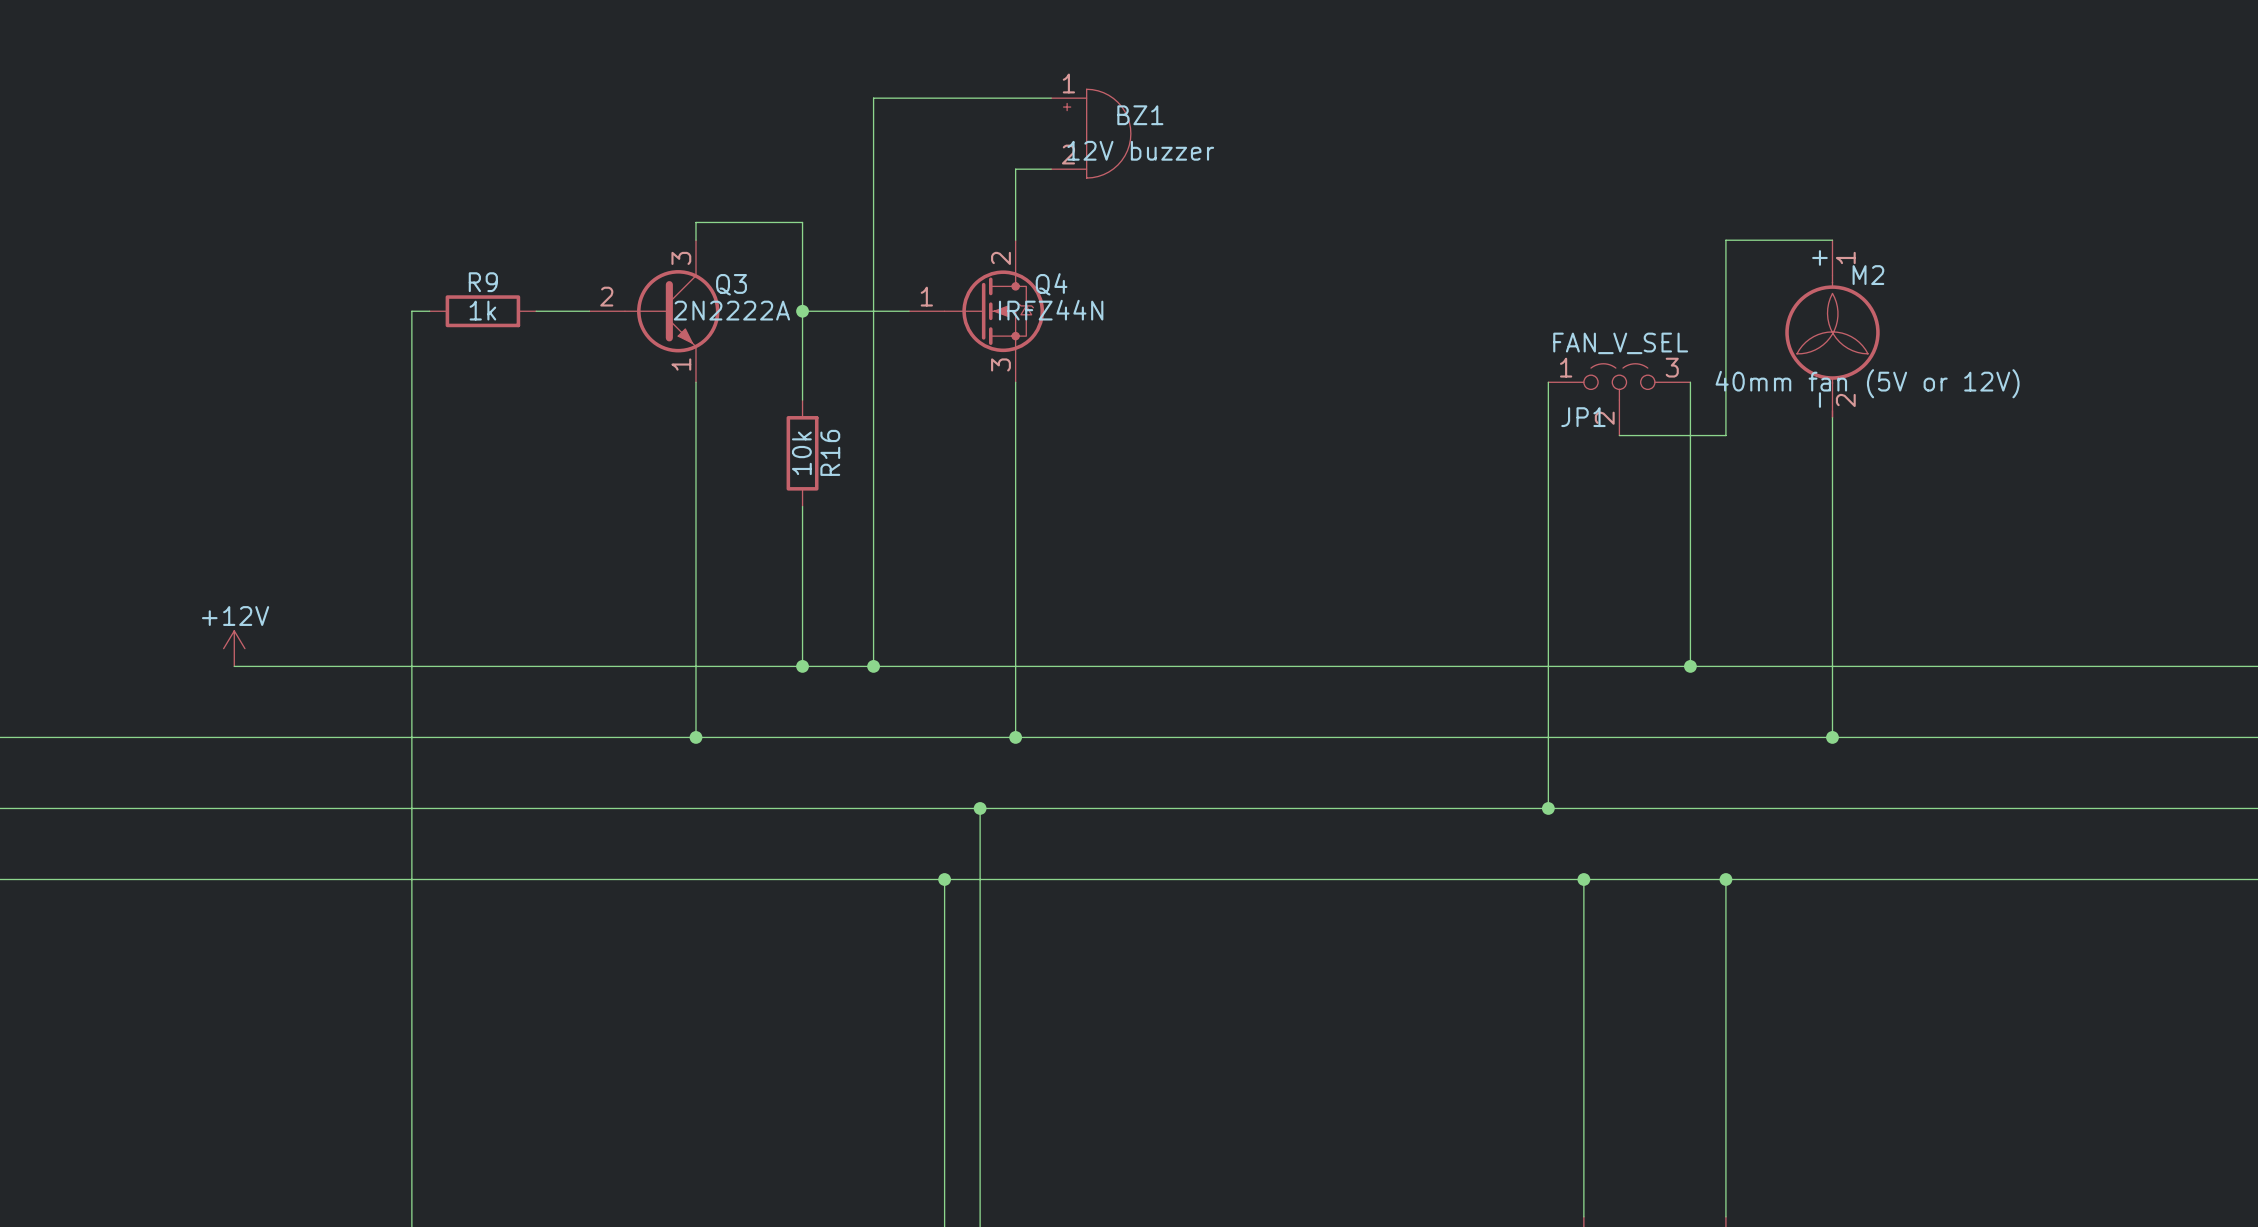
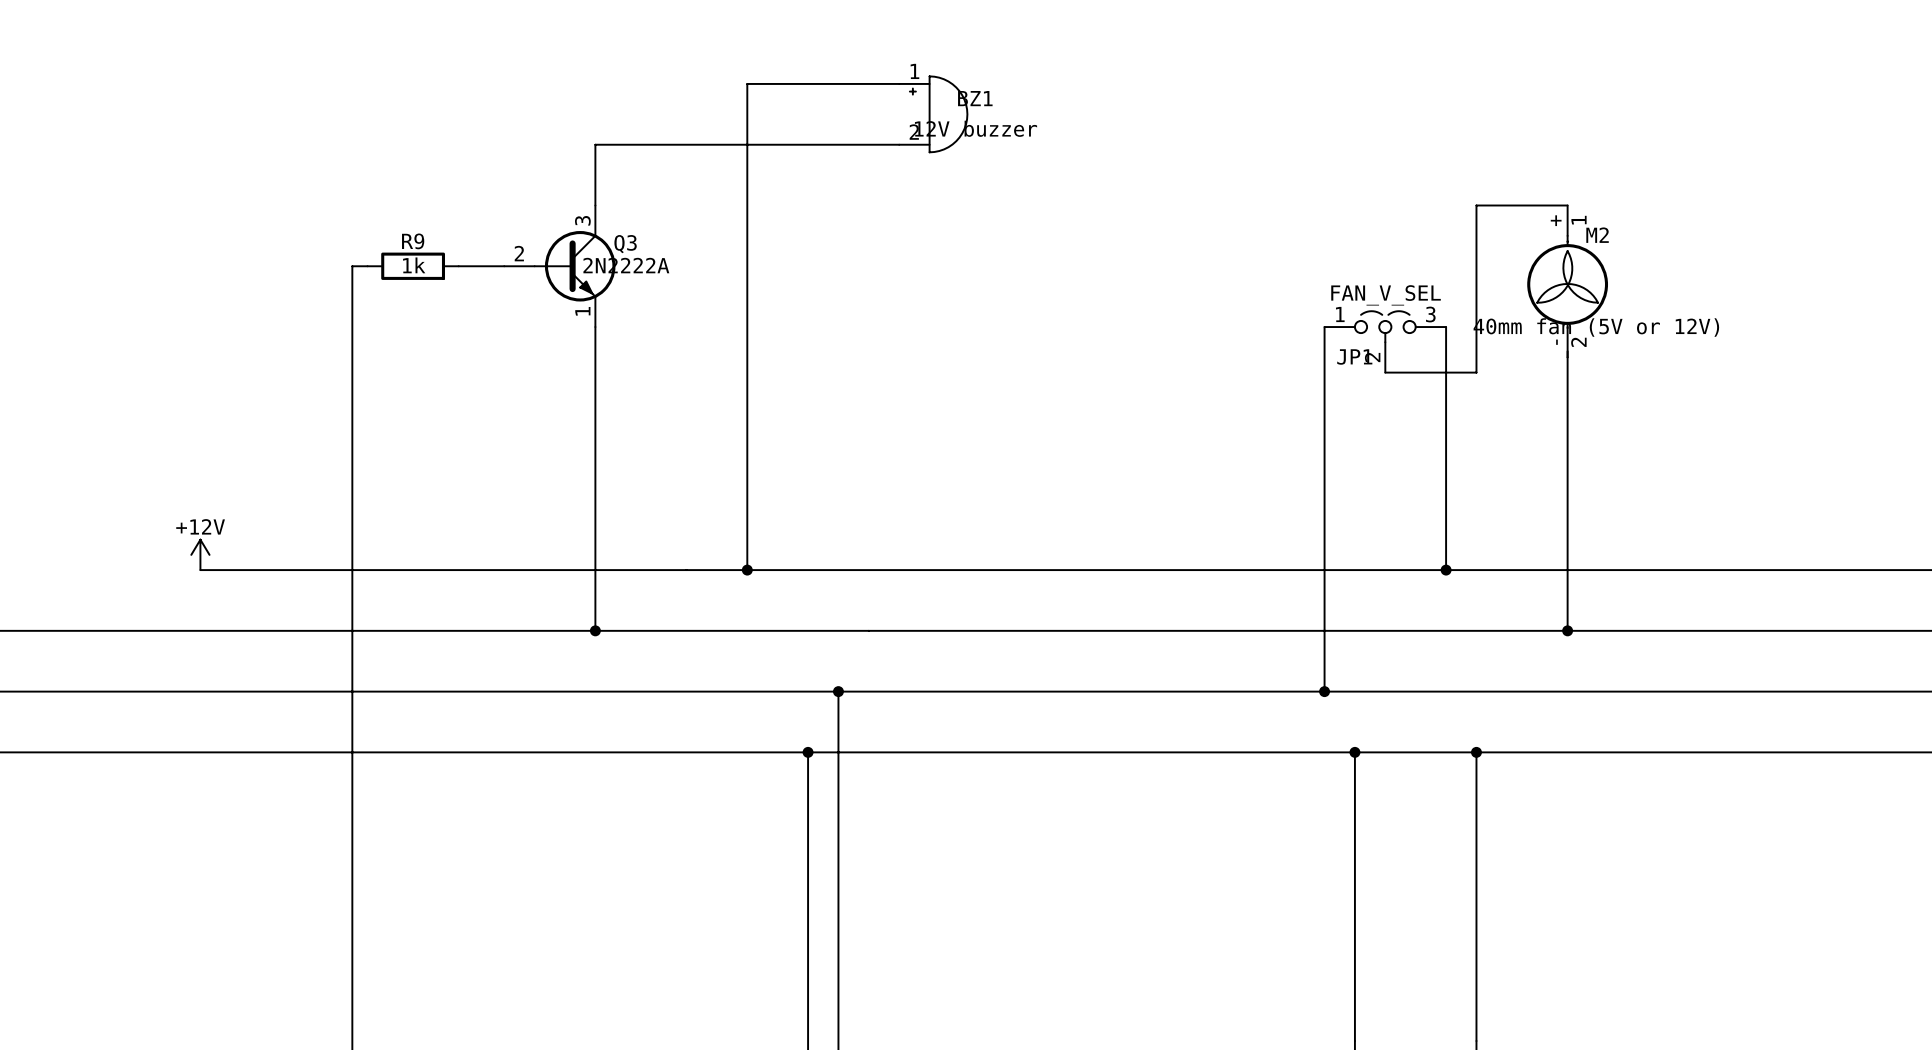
wire: (1015, 169) (1015, 240) -> none
wire: (695, 222) (802, 222) (802, 400) -> (595, 190) (595, 144) (868, 144)
wire: (802, 311) (909, 311) -> none
junction: (802, 311) -> none
Q4: IRFZ44N (976, 311) -> none
wire: (1015, 382) (1015, 737) -> none
R16: 10k (802, 453) -> none
wire: (802, 506) (802, 666) -> none
junction: (802, 666) -> none
junction: (1015, 737) -> none

